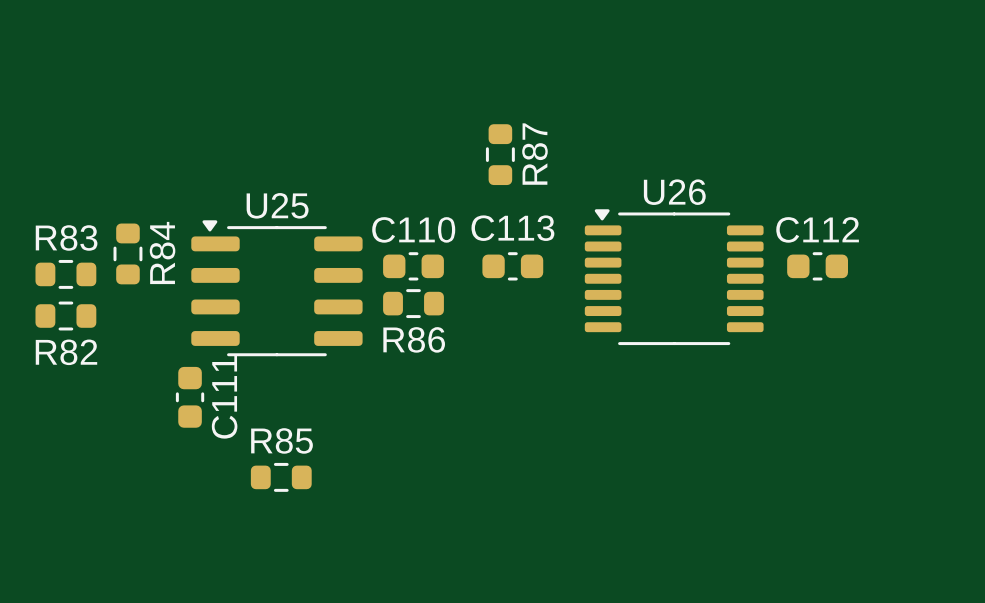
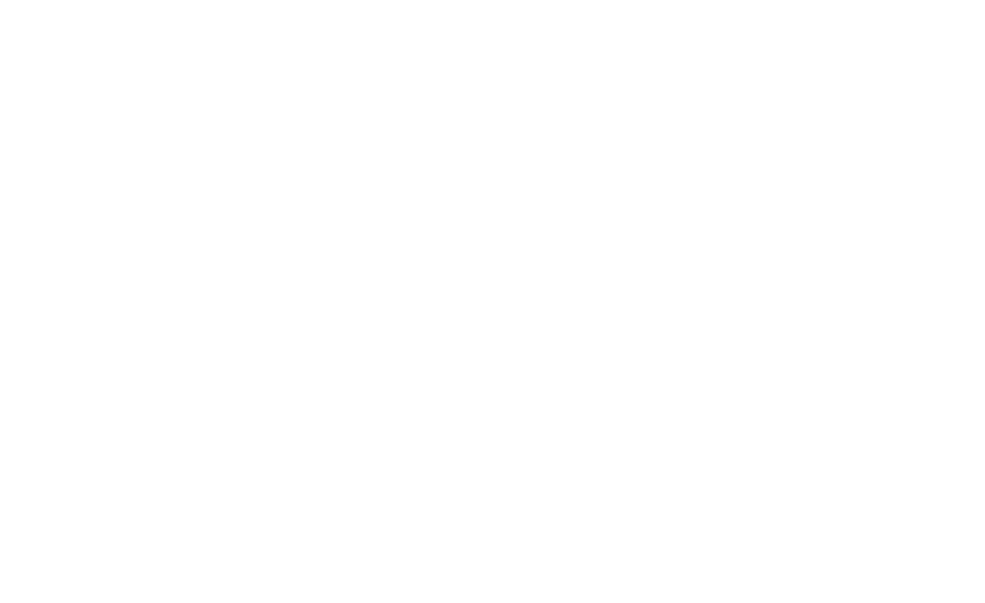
R87: (500, 154) -> none
R84: (127, 253) -> none
C110: (413, 266) -> none
C113: (512, 266) -> none
C112: (817, 266) -> none
R83: (65, 274) -> none
U26: (674, 277) -> none
U25: (276, 288) -> none
R86: (413, 303) -> none
R82: (65, 316) -> none
C111: (190, 397) -> none
R85: (281, 477) -> none

